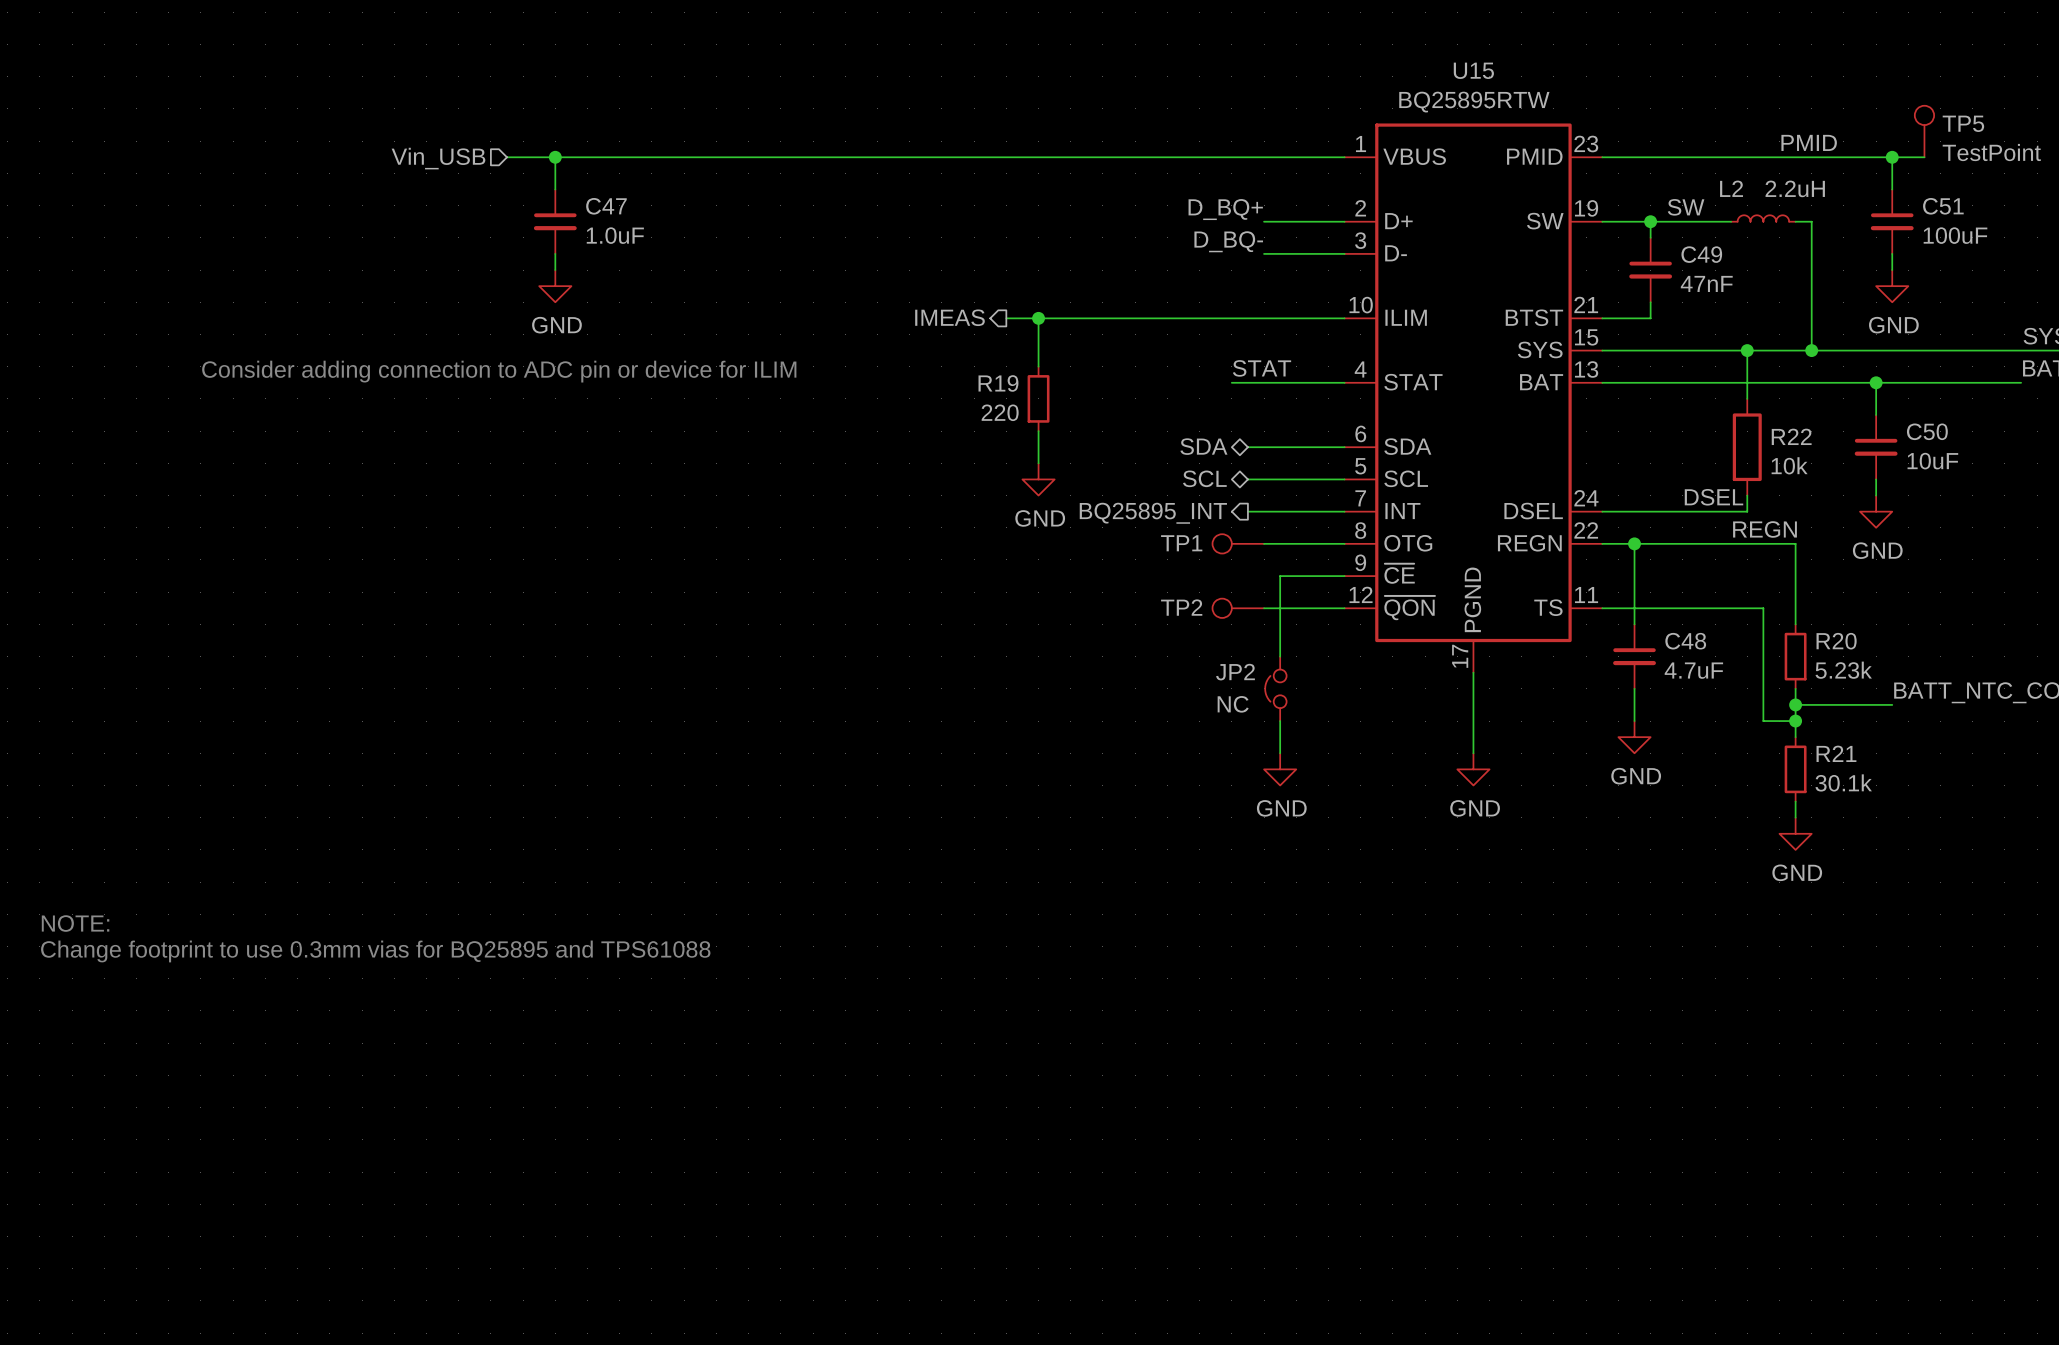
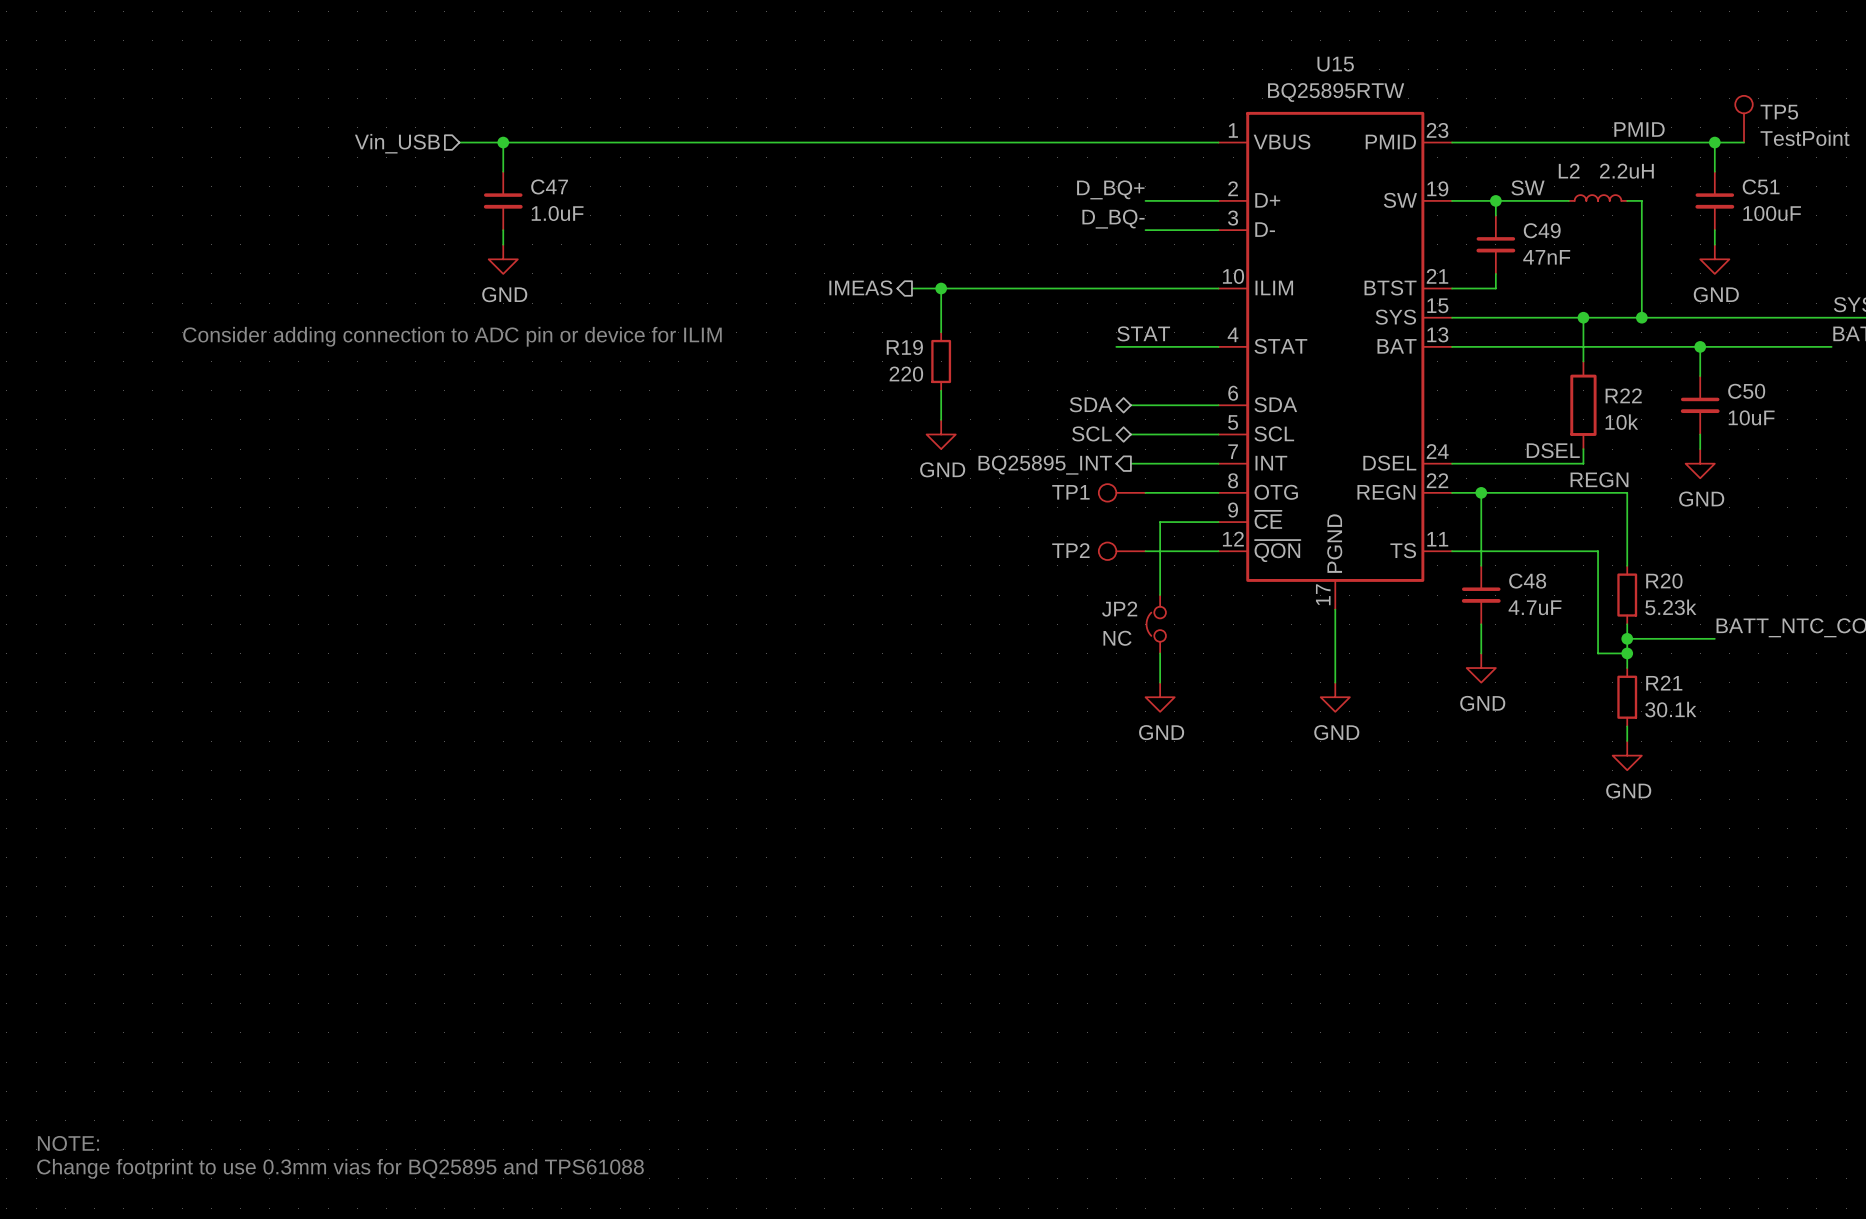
text: NOTE: (75, 923) -> none
text: Change footprint to use 0.3mm vias for BQ25895 and TPS61088 (375, 951) -> none
text: none -> NOTE: (68, 1143)
text: none -> Change footprint to use 0.3mm vias for BQ25895 and TPS61088 (340, 1168)

